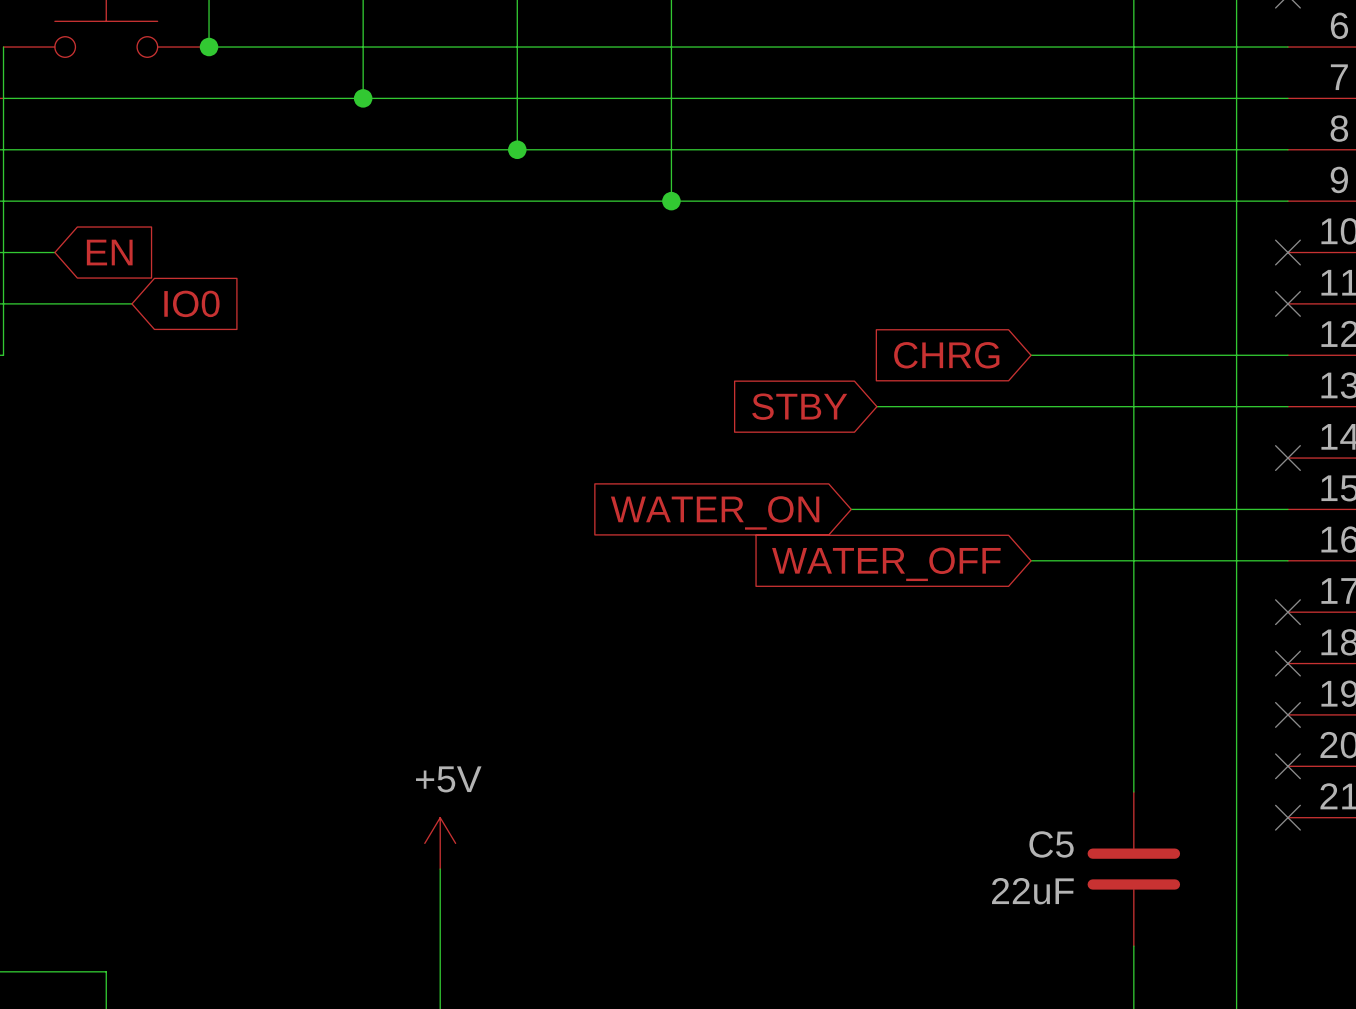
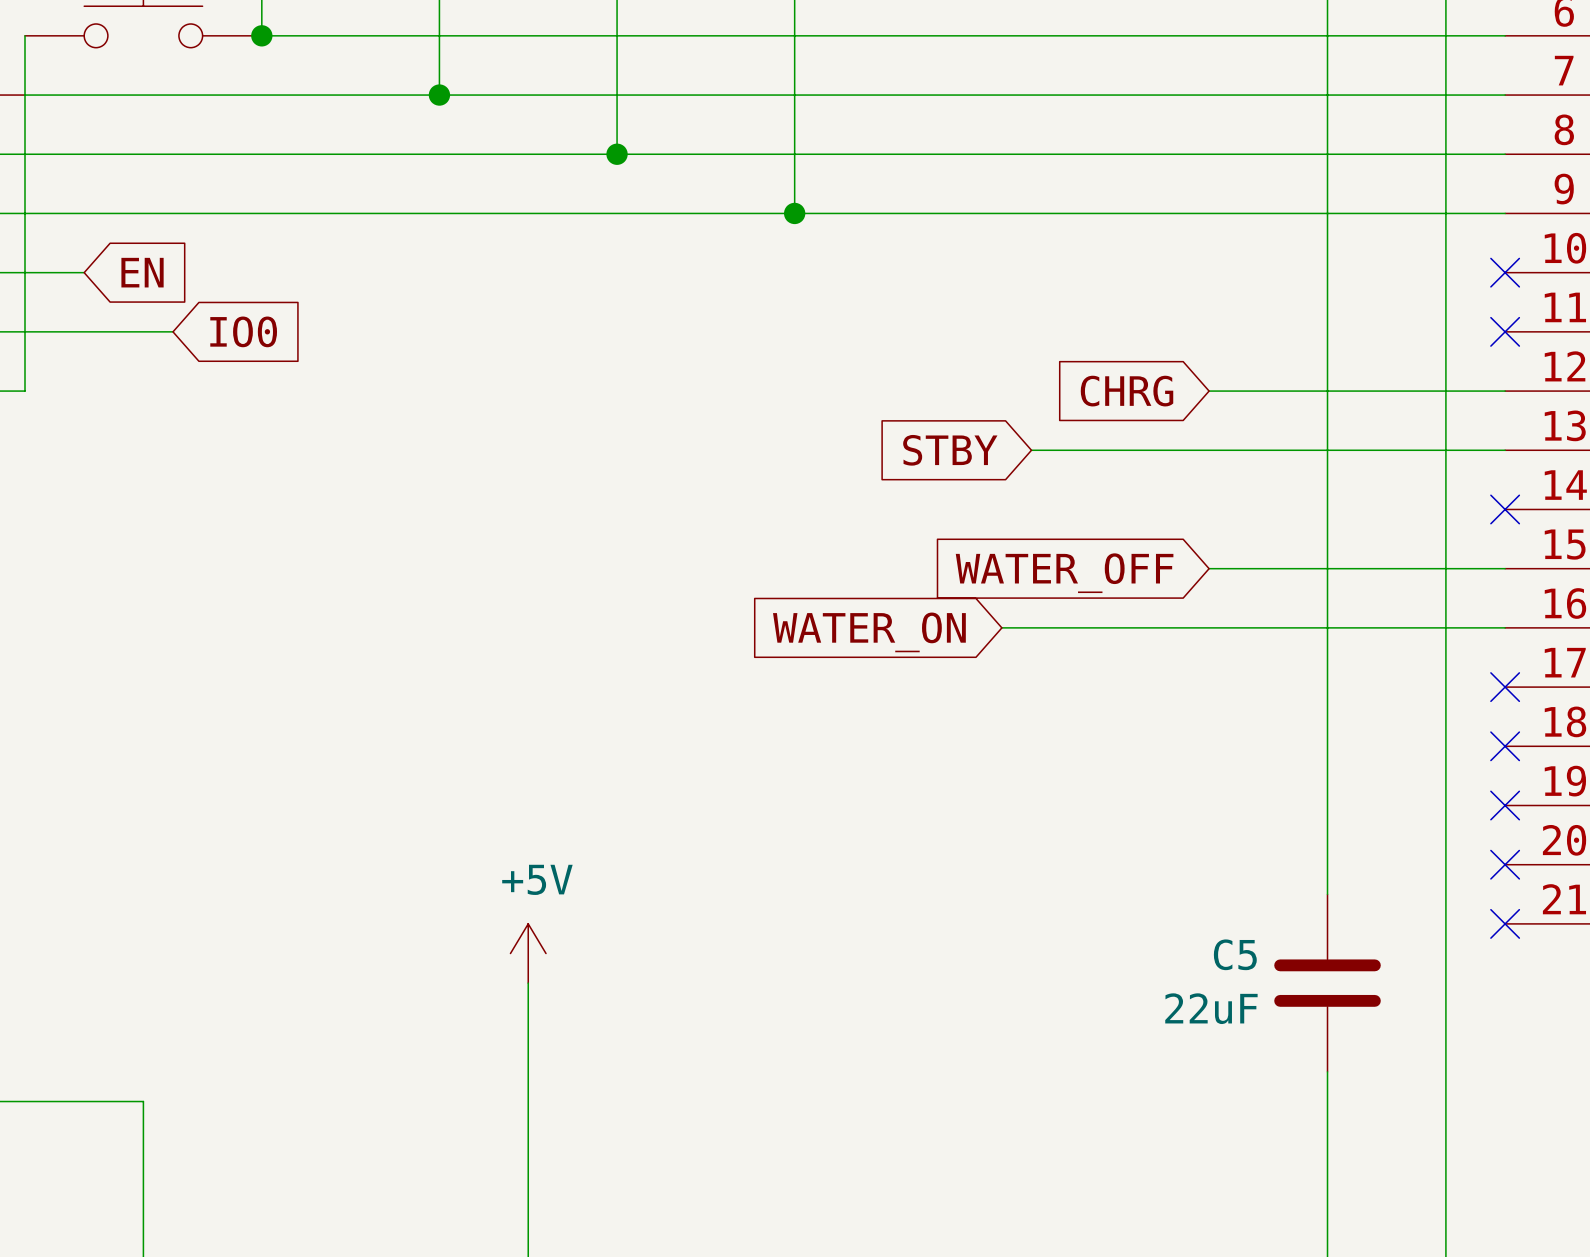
wire: (851, 509) (1031, 509) -> (1001, 627) (1209, 627)
global label position: WATER_ON (715, 512) -> WATER_ON (869, 632)
global label position: WATER_OFF (886, 564) -> WATER_OFF (1064, 573)

